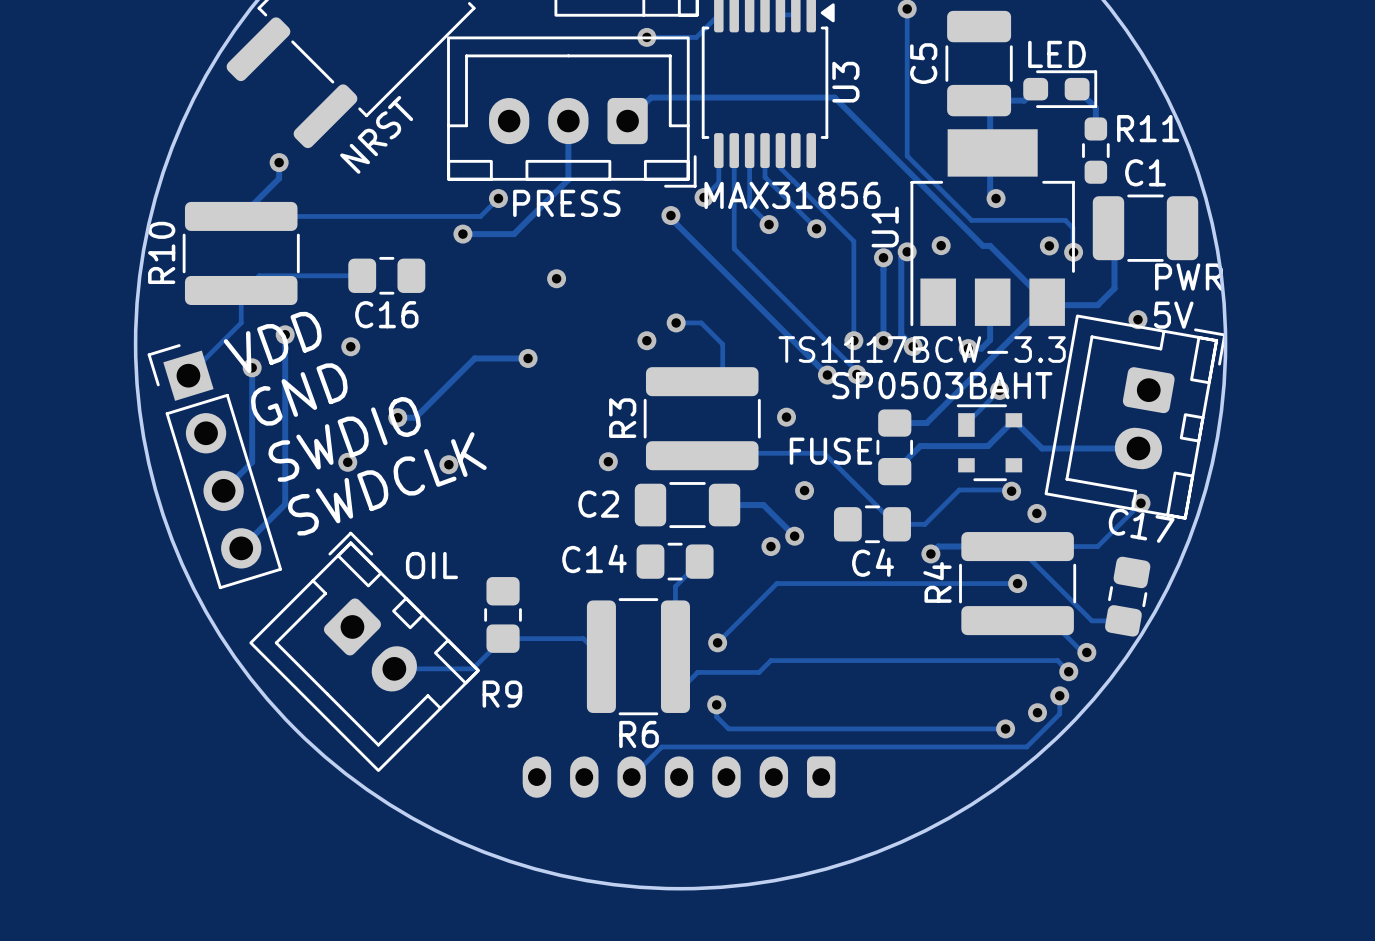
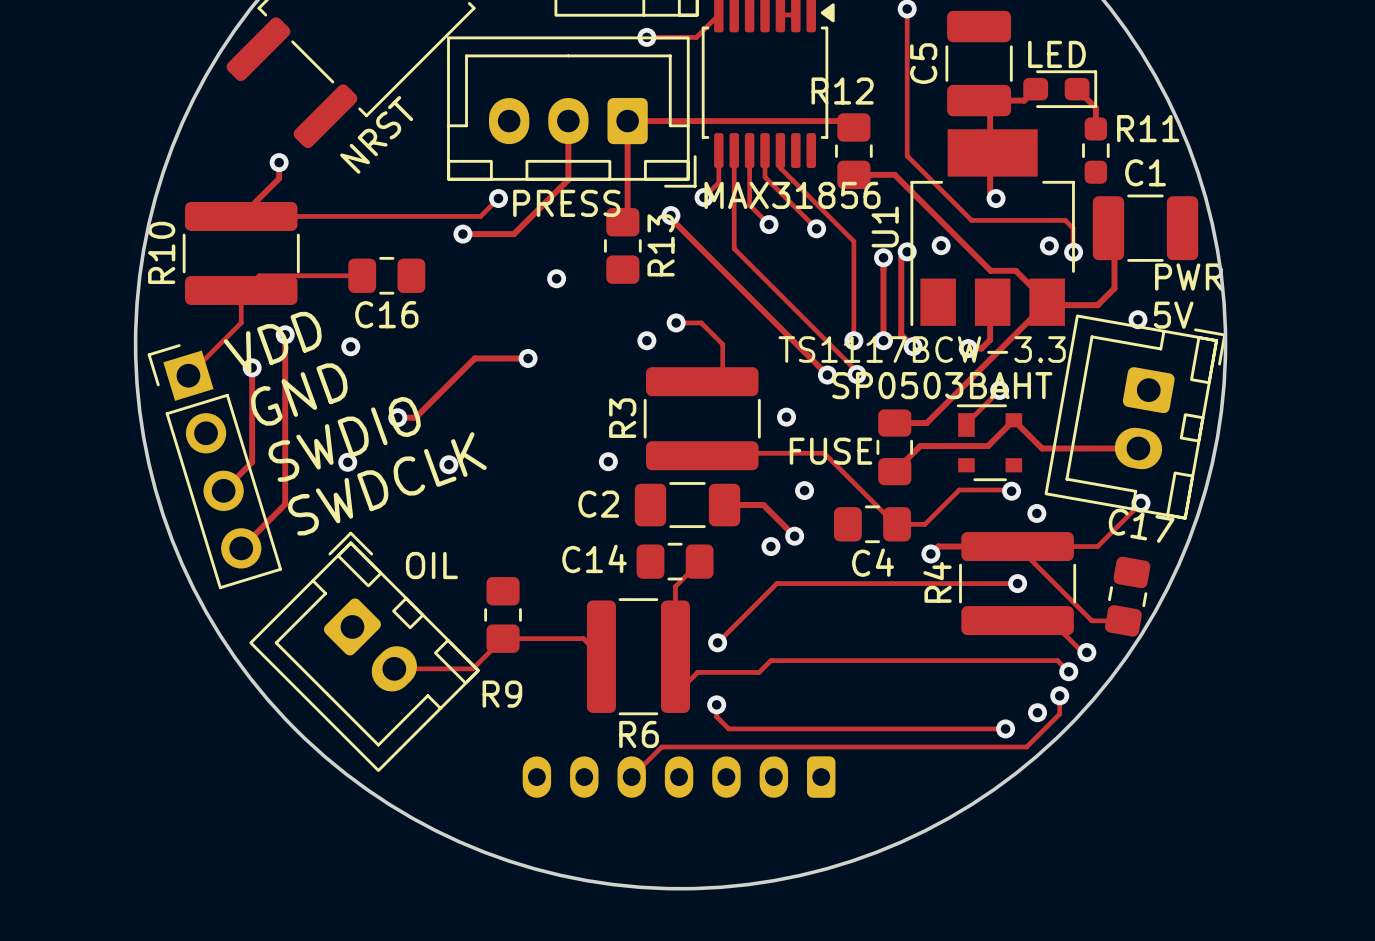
U3 name: U3 (845, 82) -> none
track: (627, 121) (651, 97) (834, 97) (982, 245) (990, 245) (1044, 300) -> none
track: none -> (853, 127) (847, 121) (627, 121) (627, 211) (622, 216) (622, 222)
R12: none -> (853, 151)
track: none -> (853, 174) (894, 174) (990, 270) (1015, 270) (1047, 302)
R13: none -> (622, 245)

